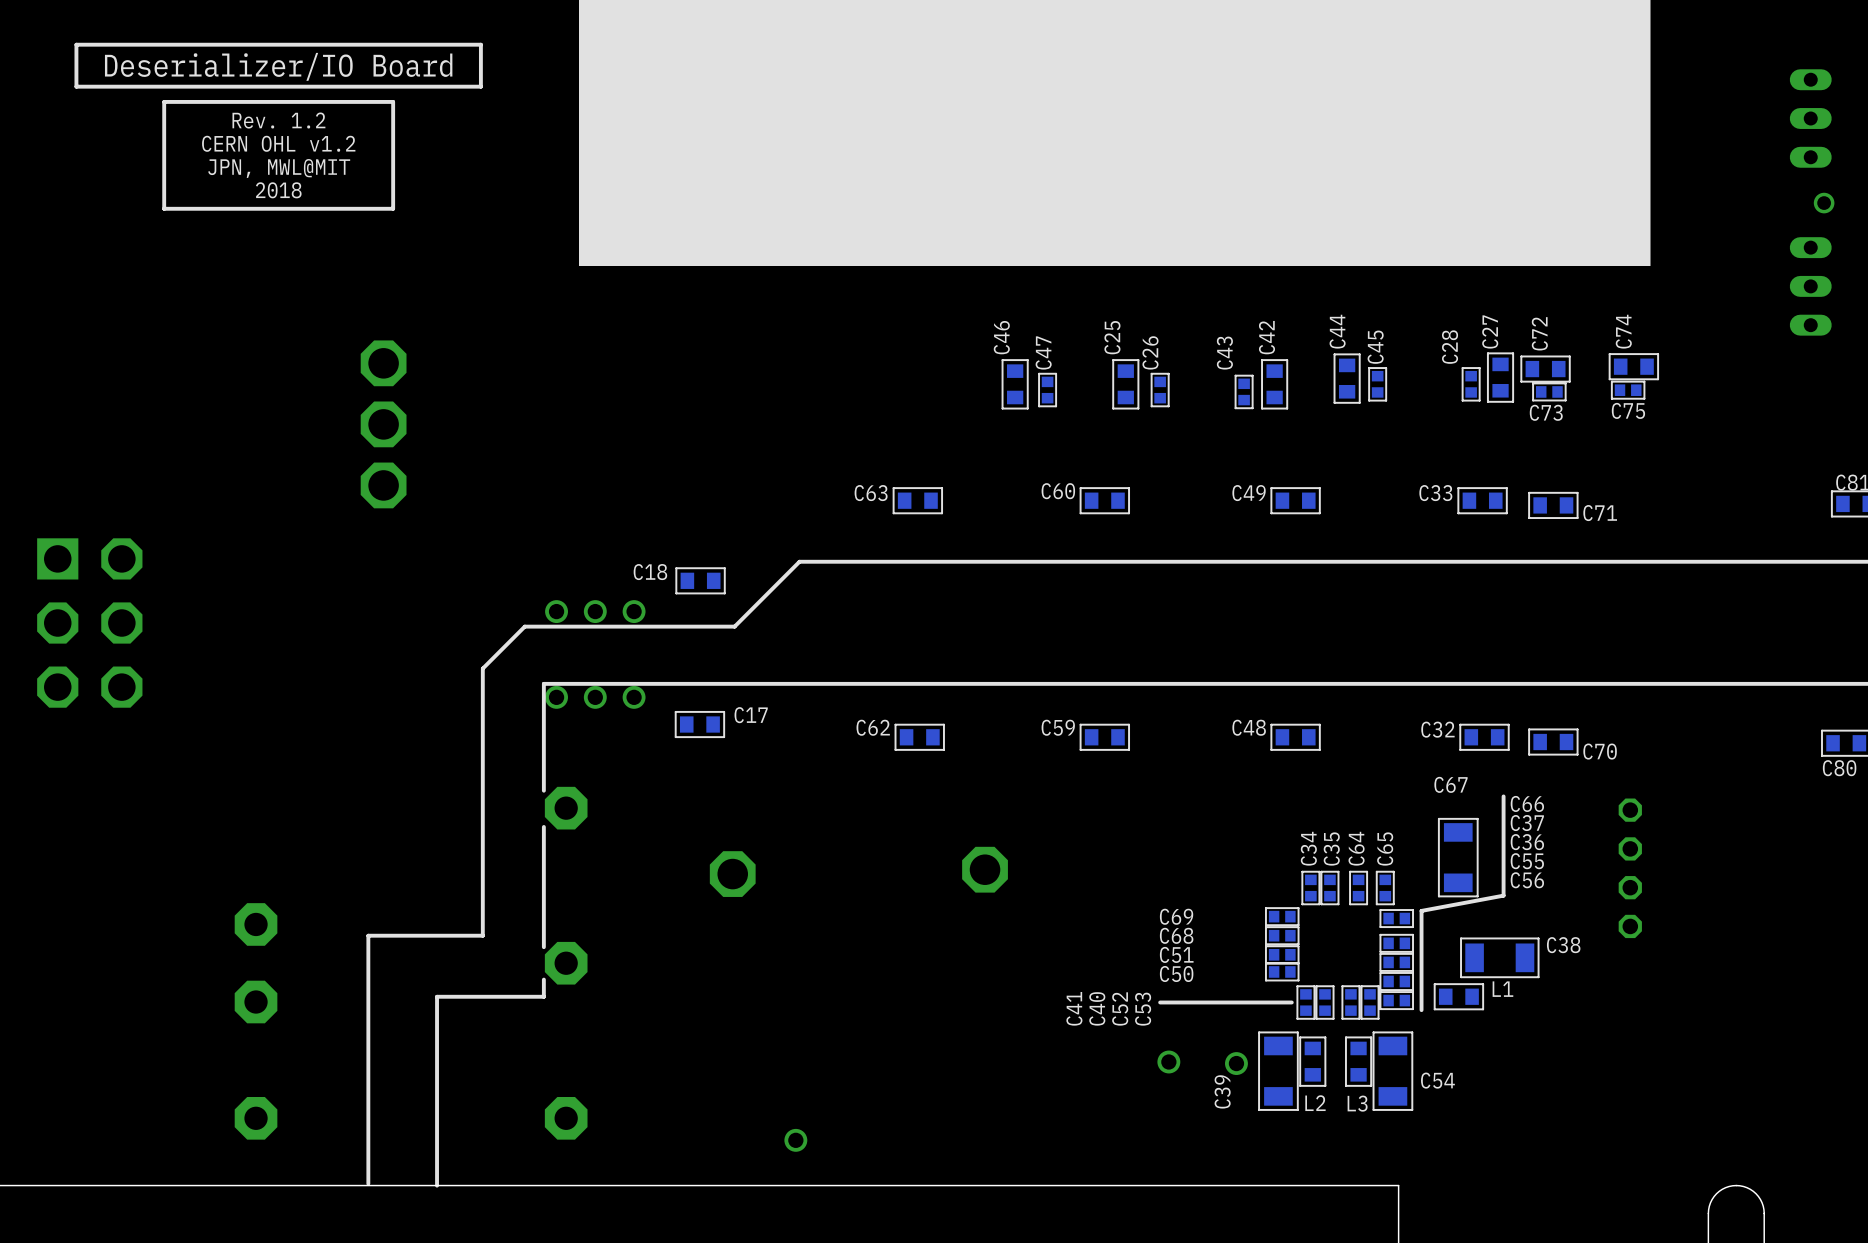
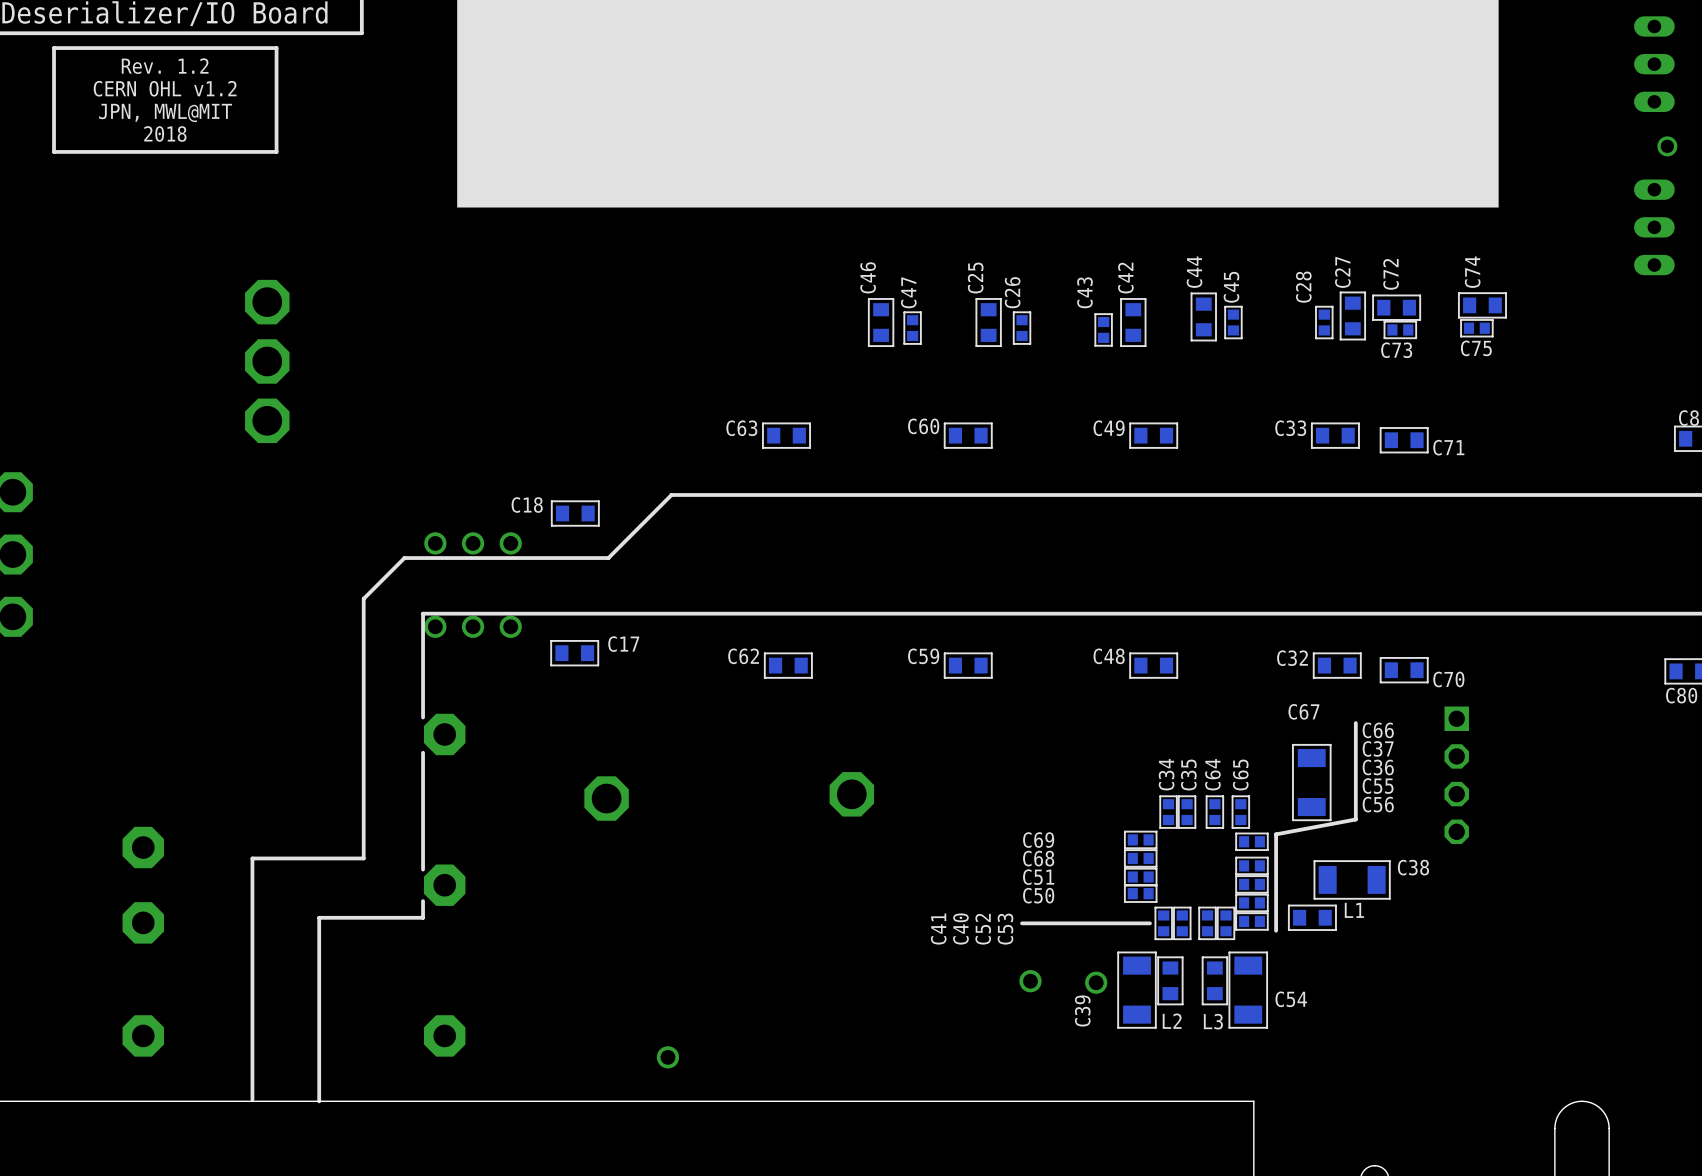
part: none -> (1456, 775)
part: (1630, 868) -> none

